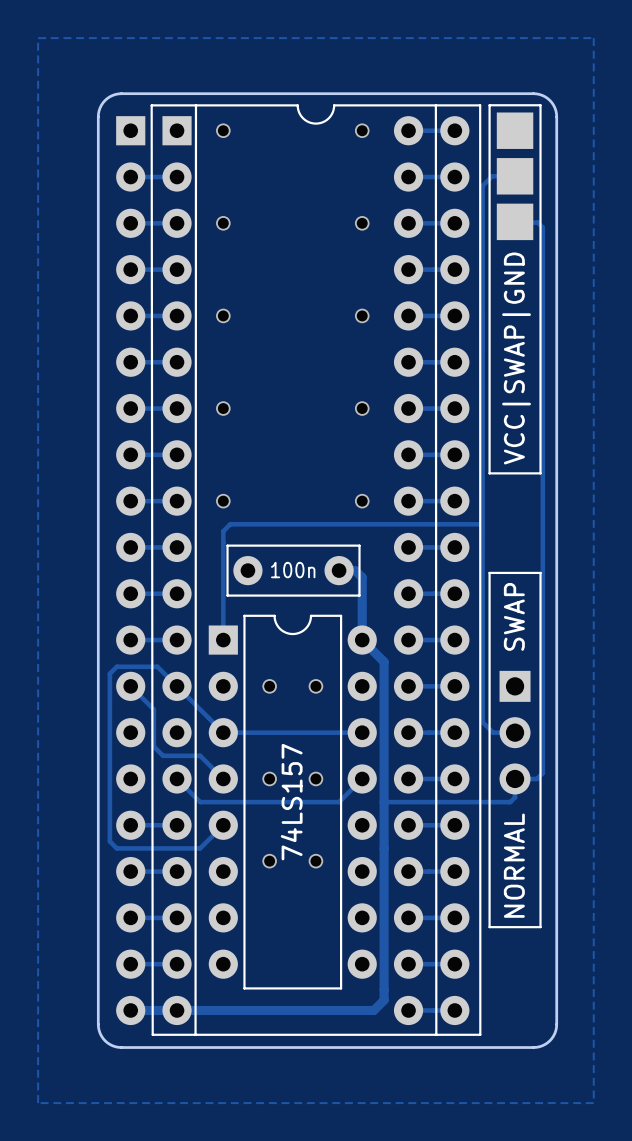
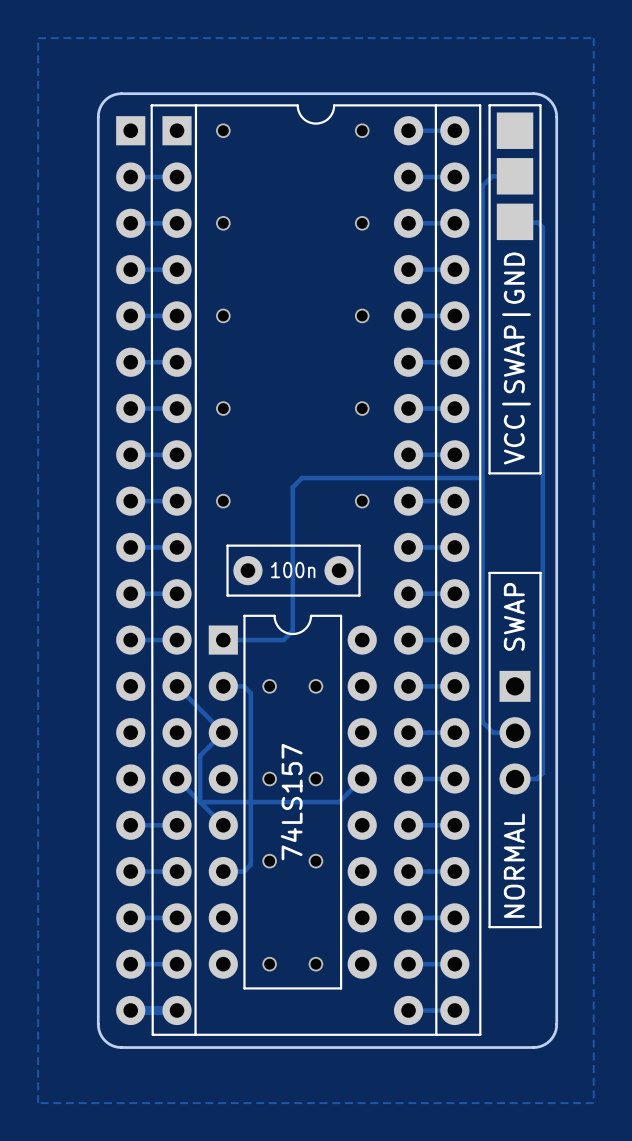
track: (482, 524) (230, 524) (223, 531) (223, 640) -> (482, 478) (302, 478) (292, 487) (292, 630) (283, 640) (223, 640)
track: (339, 570) (355, 570) (362, 577) (362, 640) (384, 661) (384, 1000) (373, 1010) (177, 1010) -> none
track: (130, 686) (153, 709) (153, 746) (163, 755) (200, 755) (223, 778) -> none
track: (177, 686) (157, 666) (116, 666) (109, 673) (109, 841) (116, 848) (200, 848) (223, 825) -> (223, 732) (200, 755) (200, 802) (223, 825)
track: none -> (223, 686) (243, 686) (250, 693) (250, 864) (243, 871) (223, 871)
track: (223, 732) (362, 732) -> none
track: (515, 778) (515, 797) (510, 802) (384, 802) -> none
via: none -> (269, 964)
via: none -> (315, 964)

